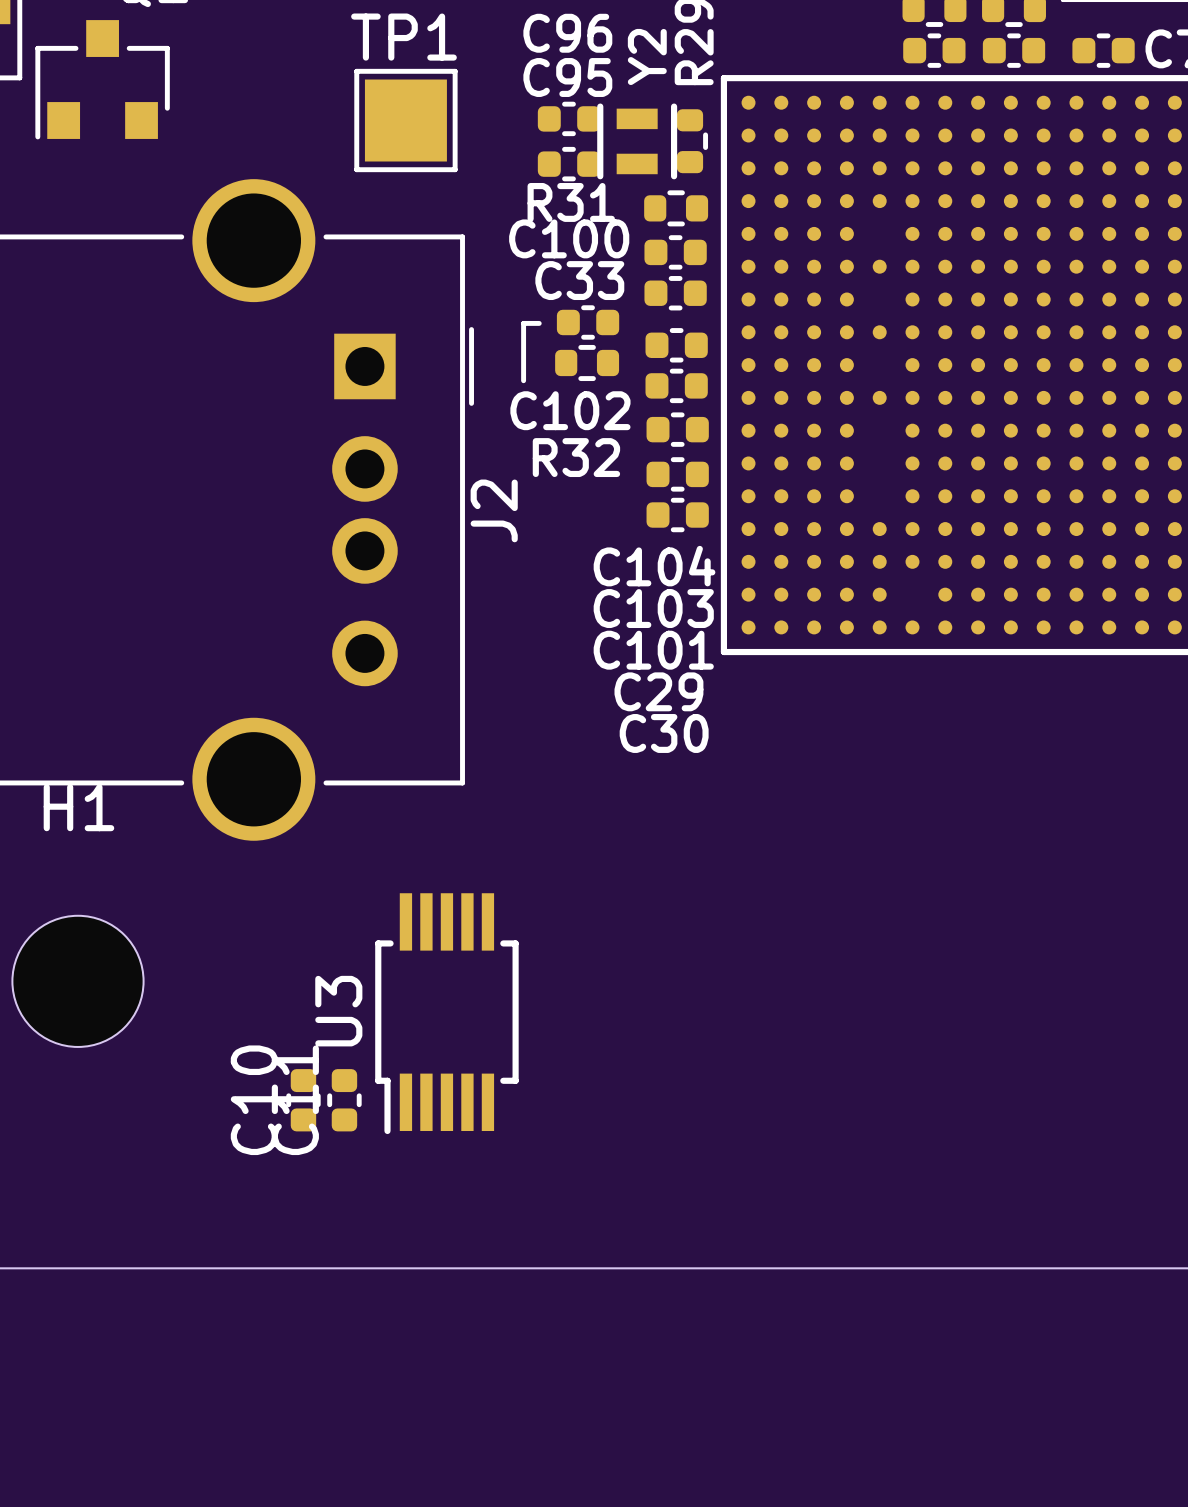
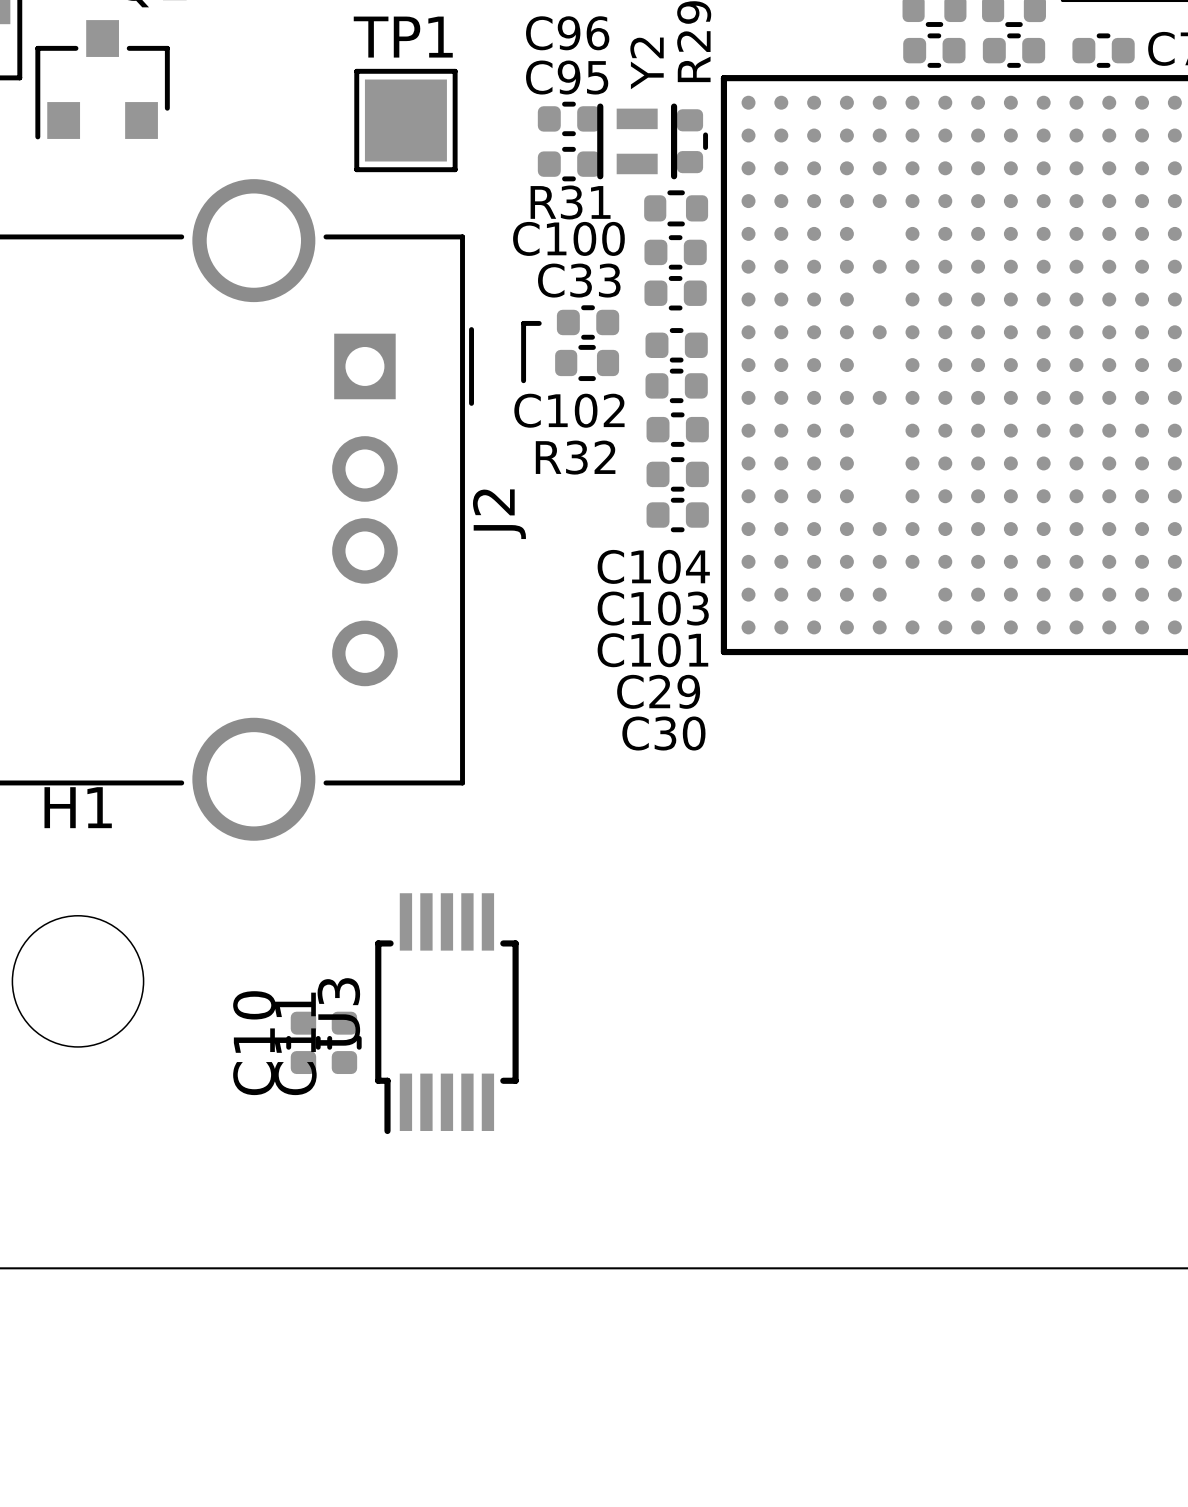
C10 position: (303, 1100) -> (303, 1042)
C11 position: (344, 1100) -> (344, 1042)

